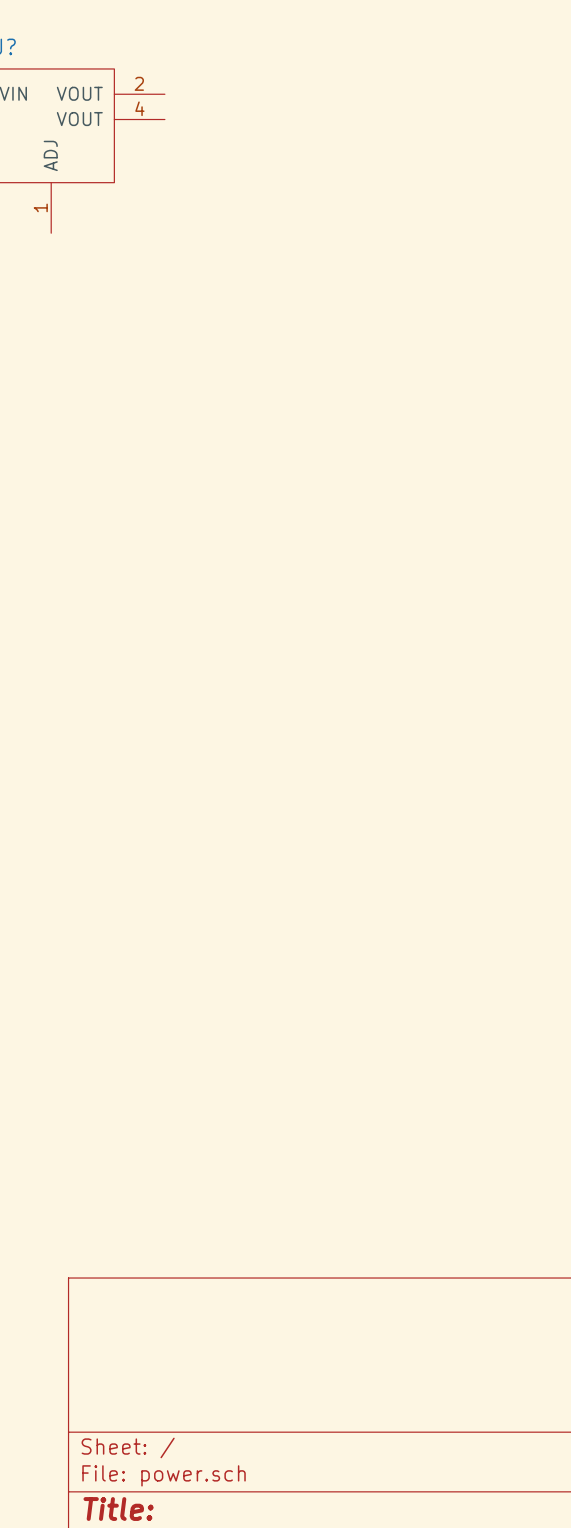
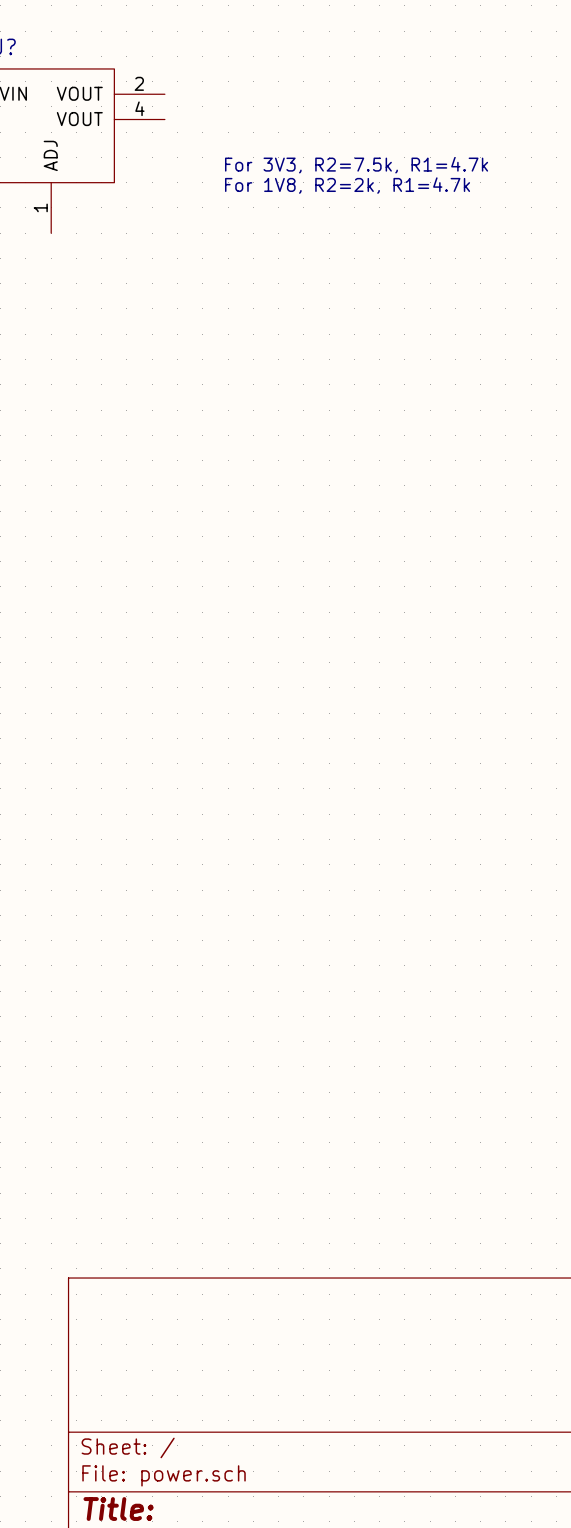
text: none -> For 3V3, R2=7.5k, R1=4.7k (356, 165)
text: none -> For 1V8, R2=2k, R1=4.7k (347, 185)

